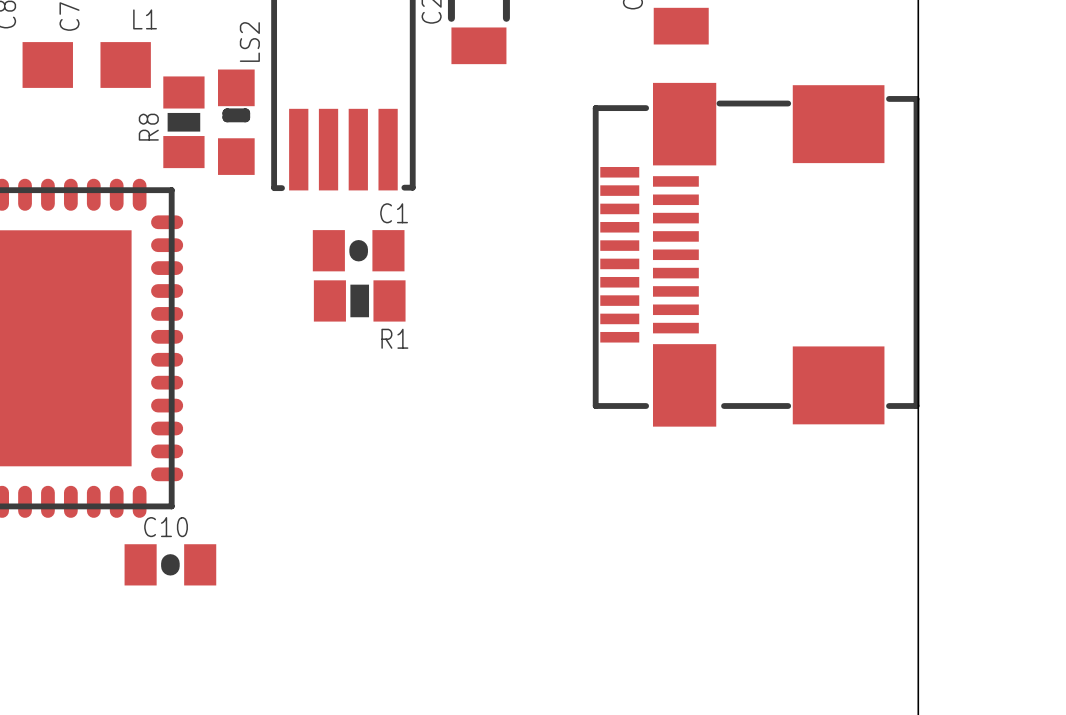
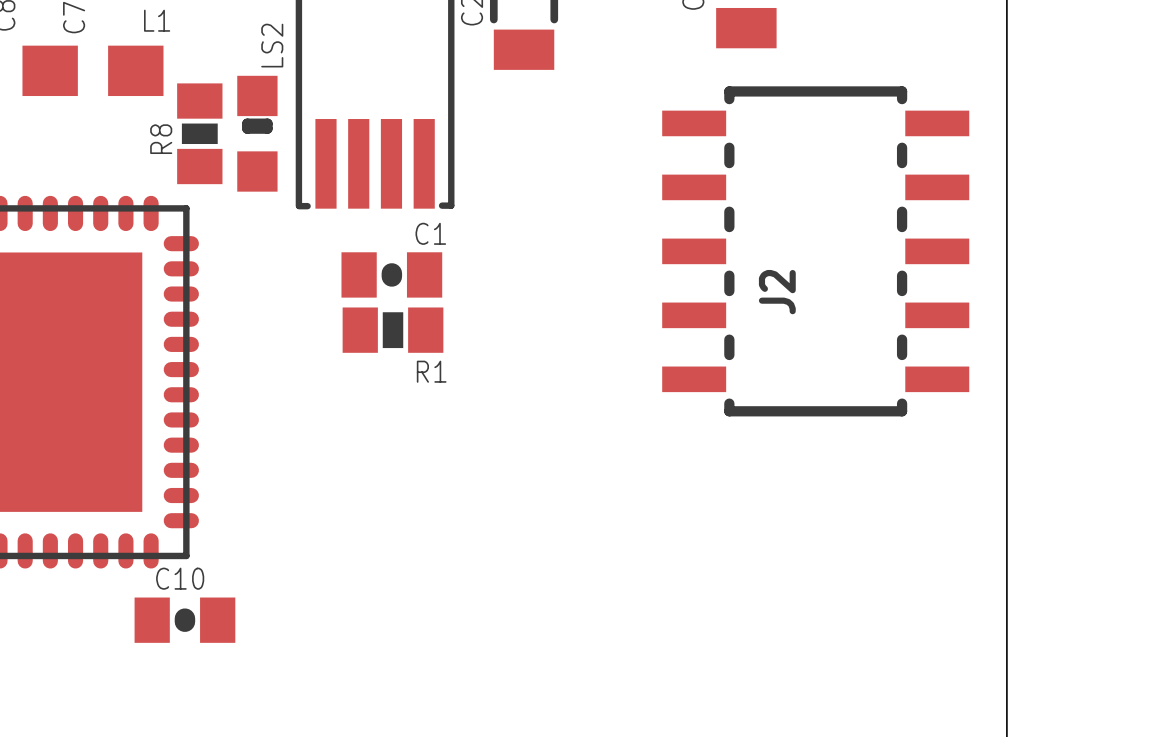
J2: none -> (815, 251)
part: (756, 254) -> none

